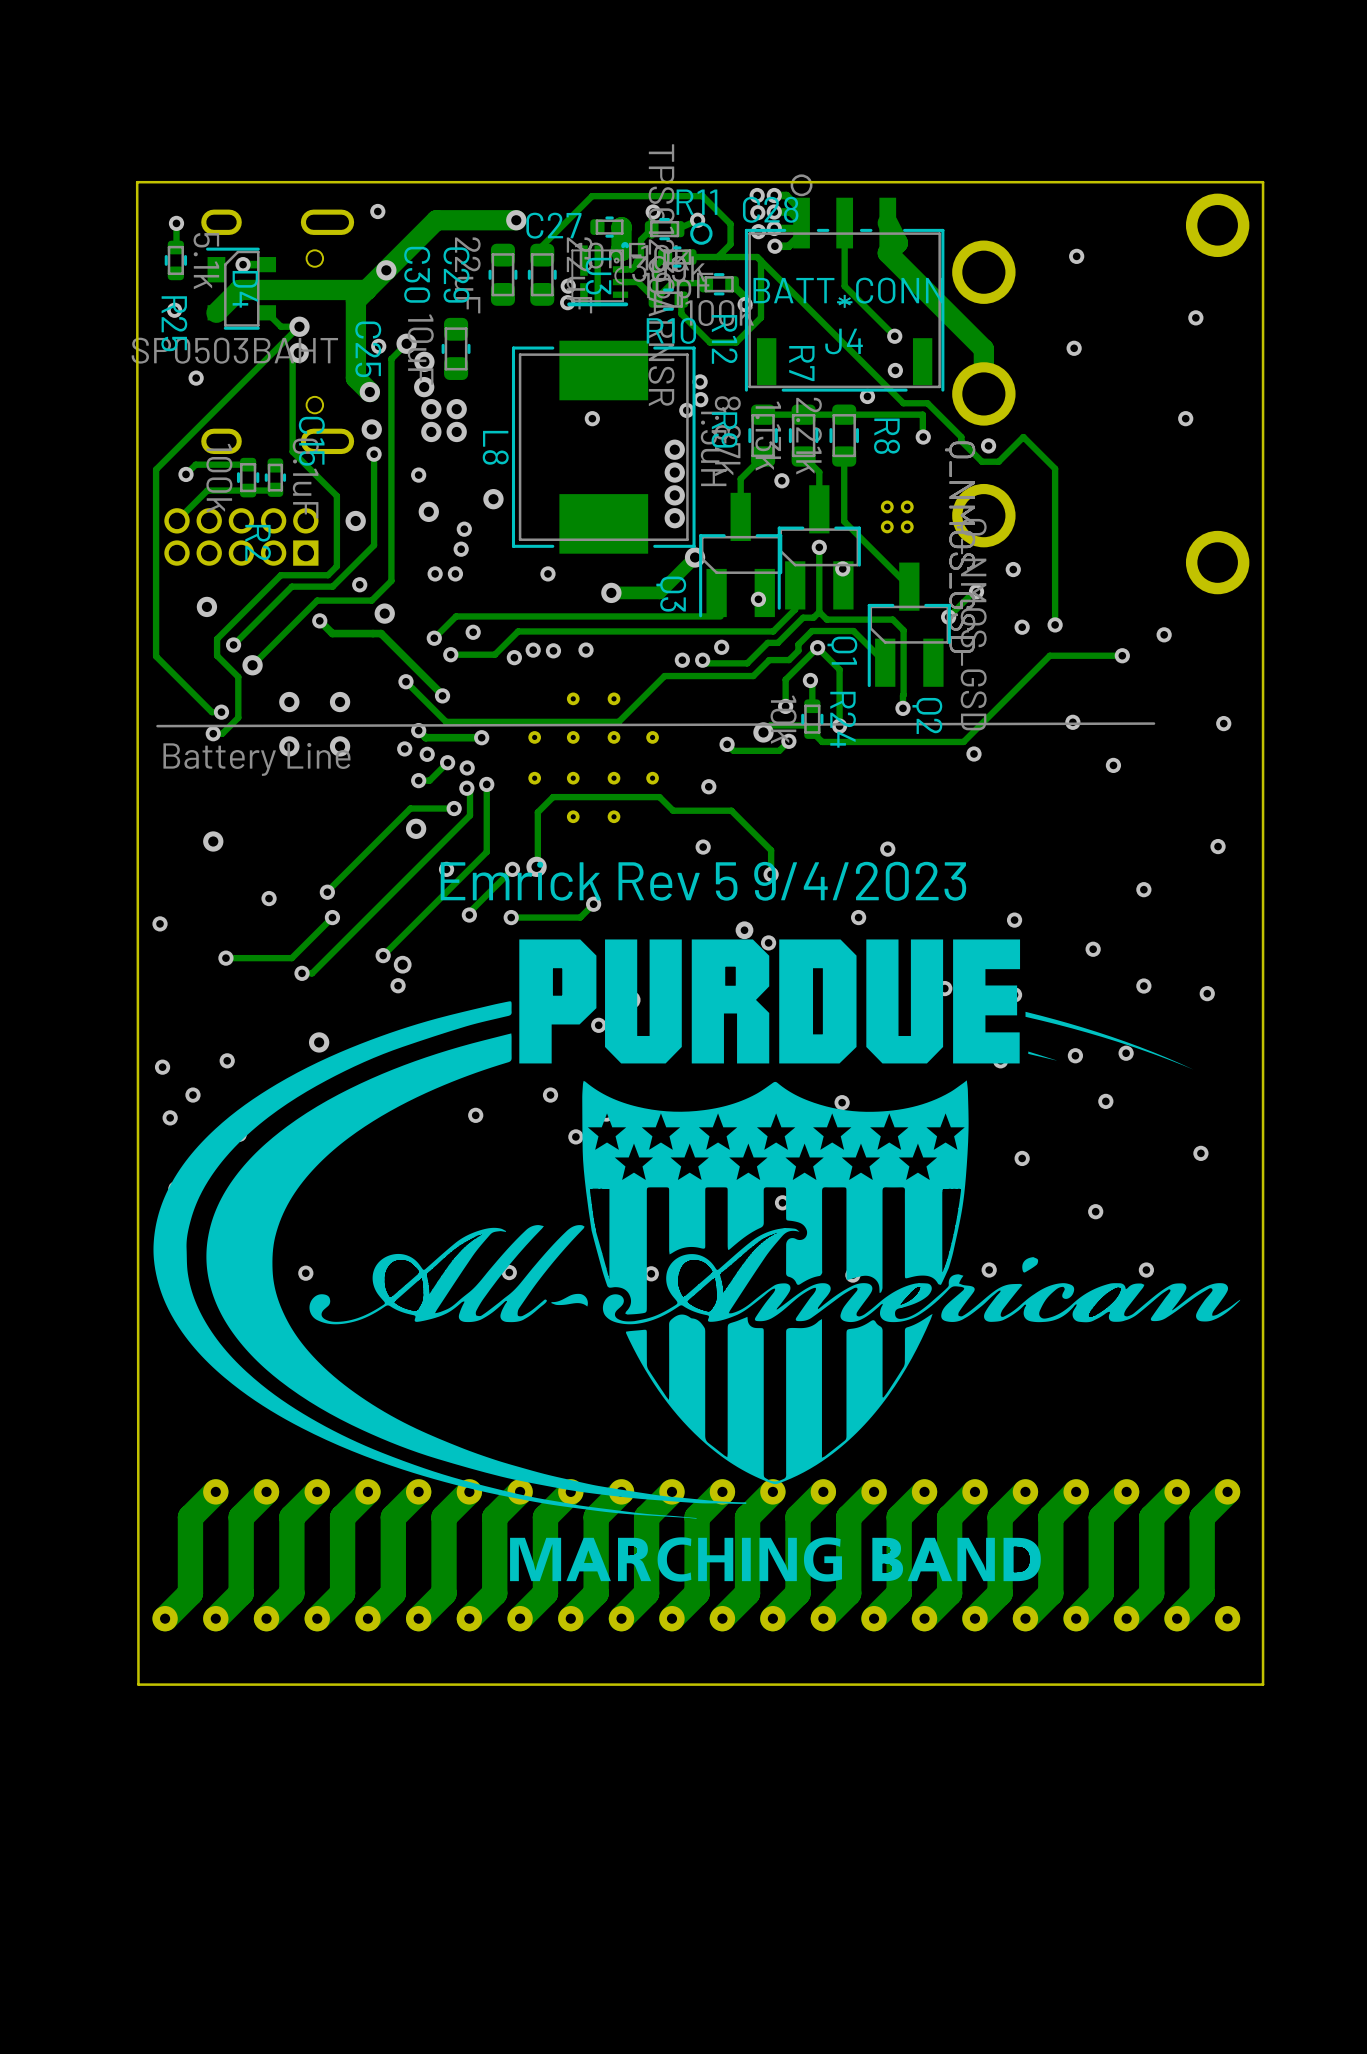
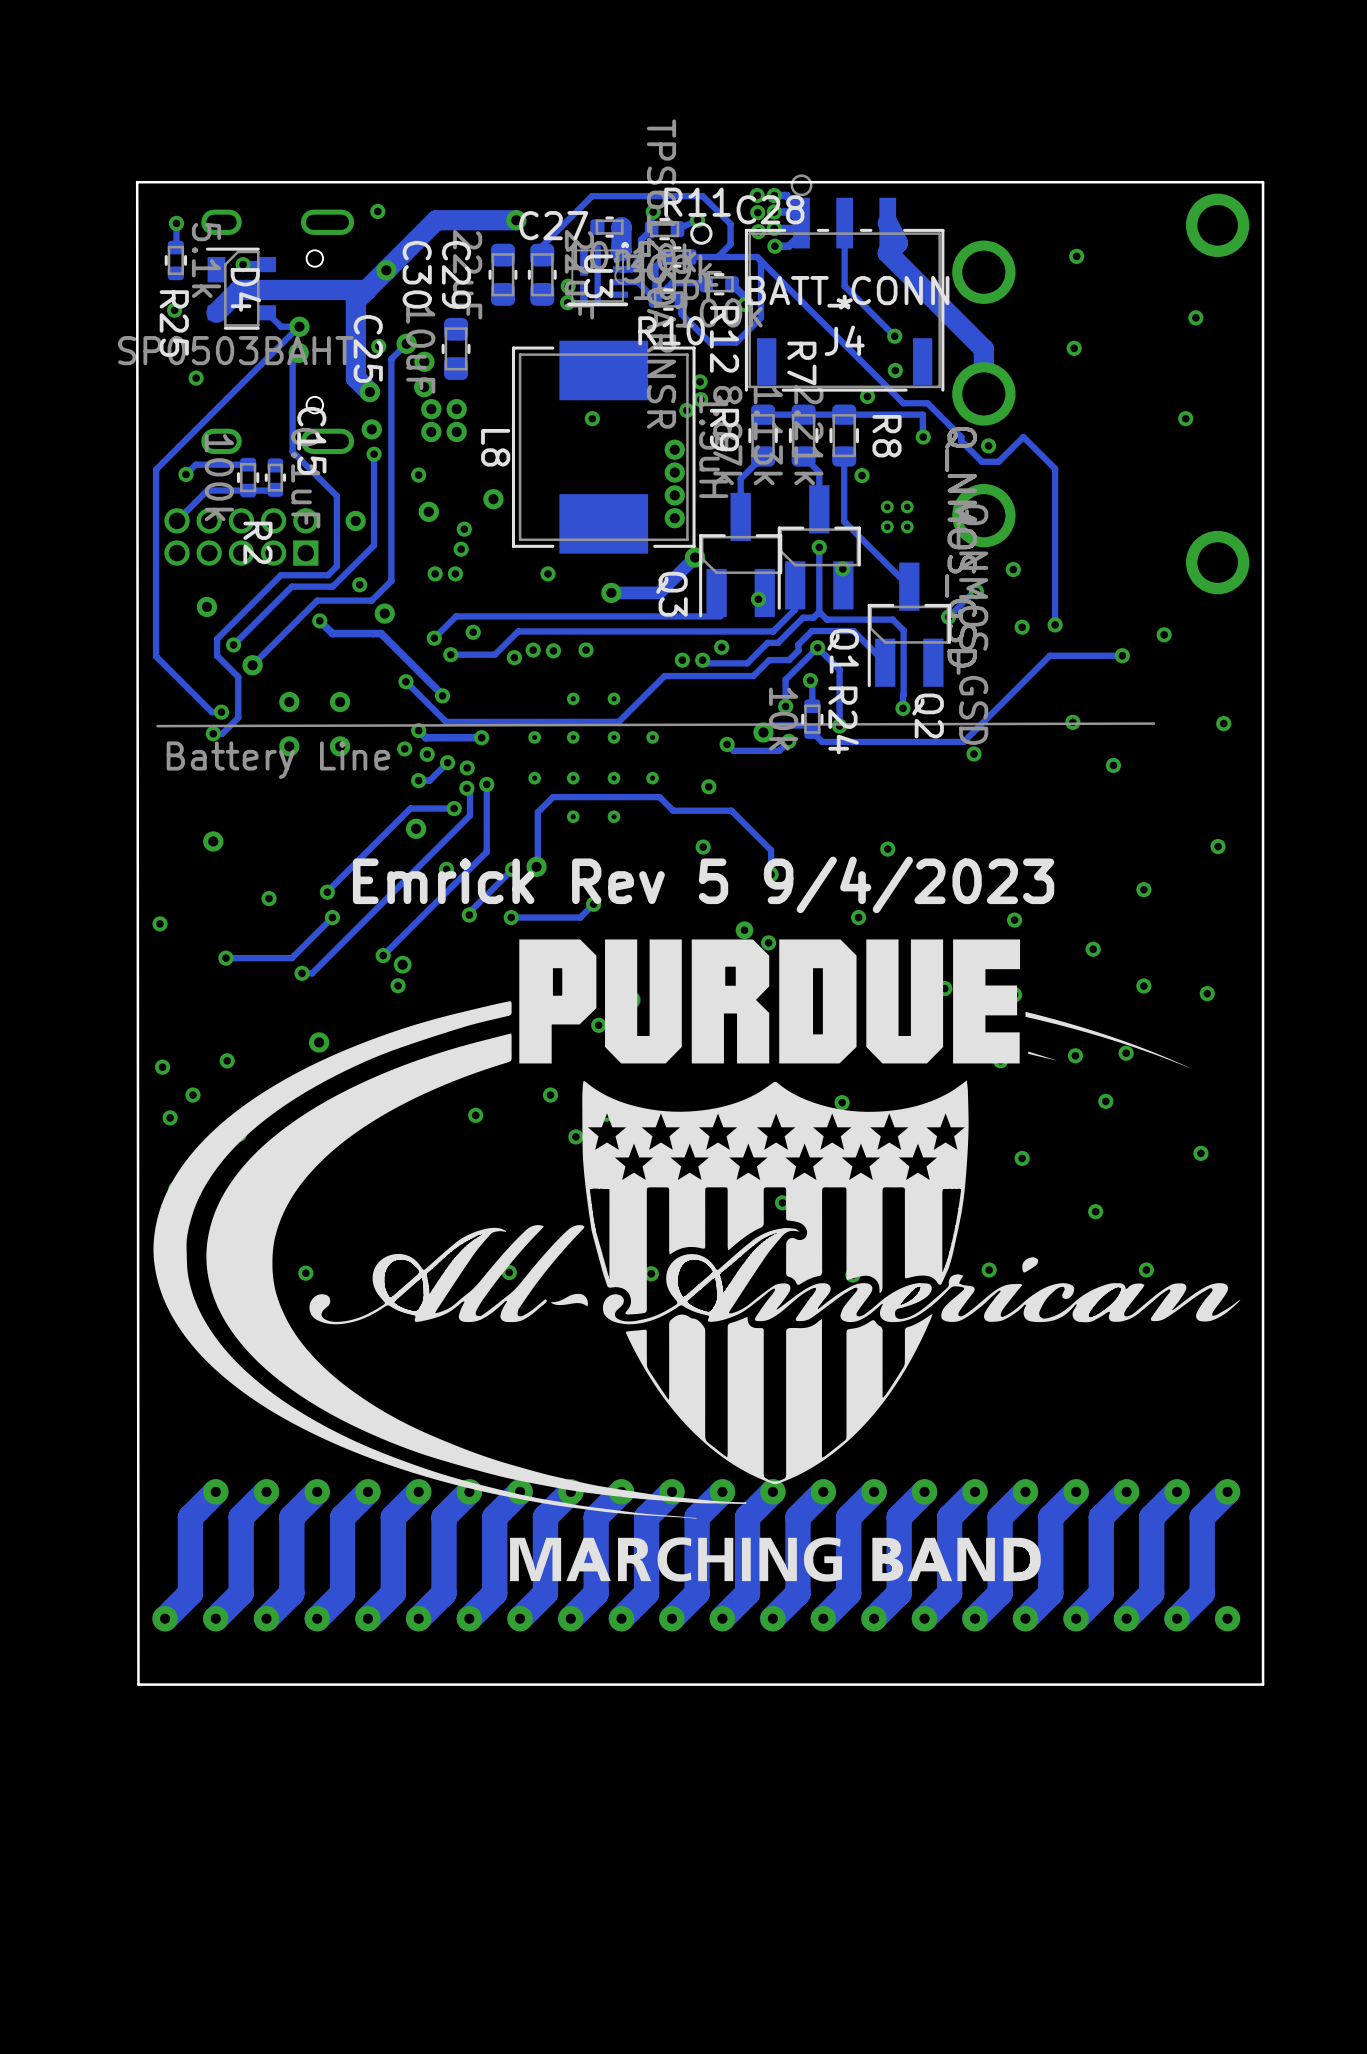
via position: (781, 480) -> (862, 475)

